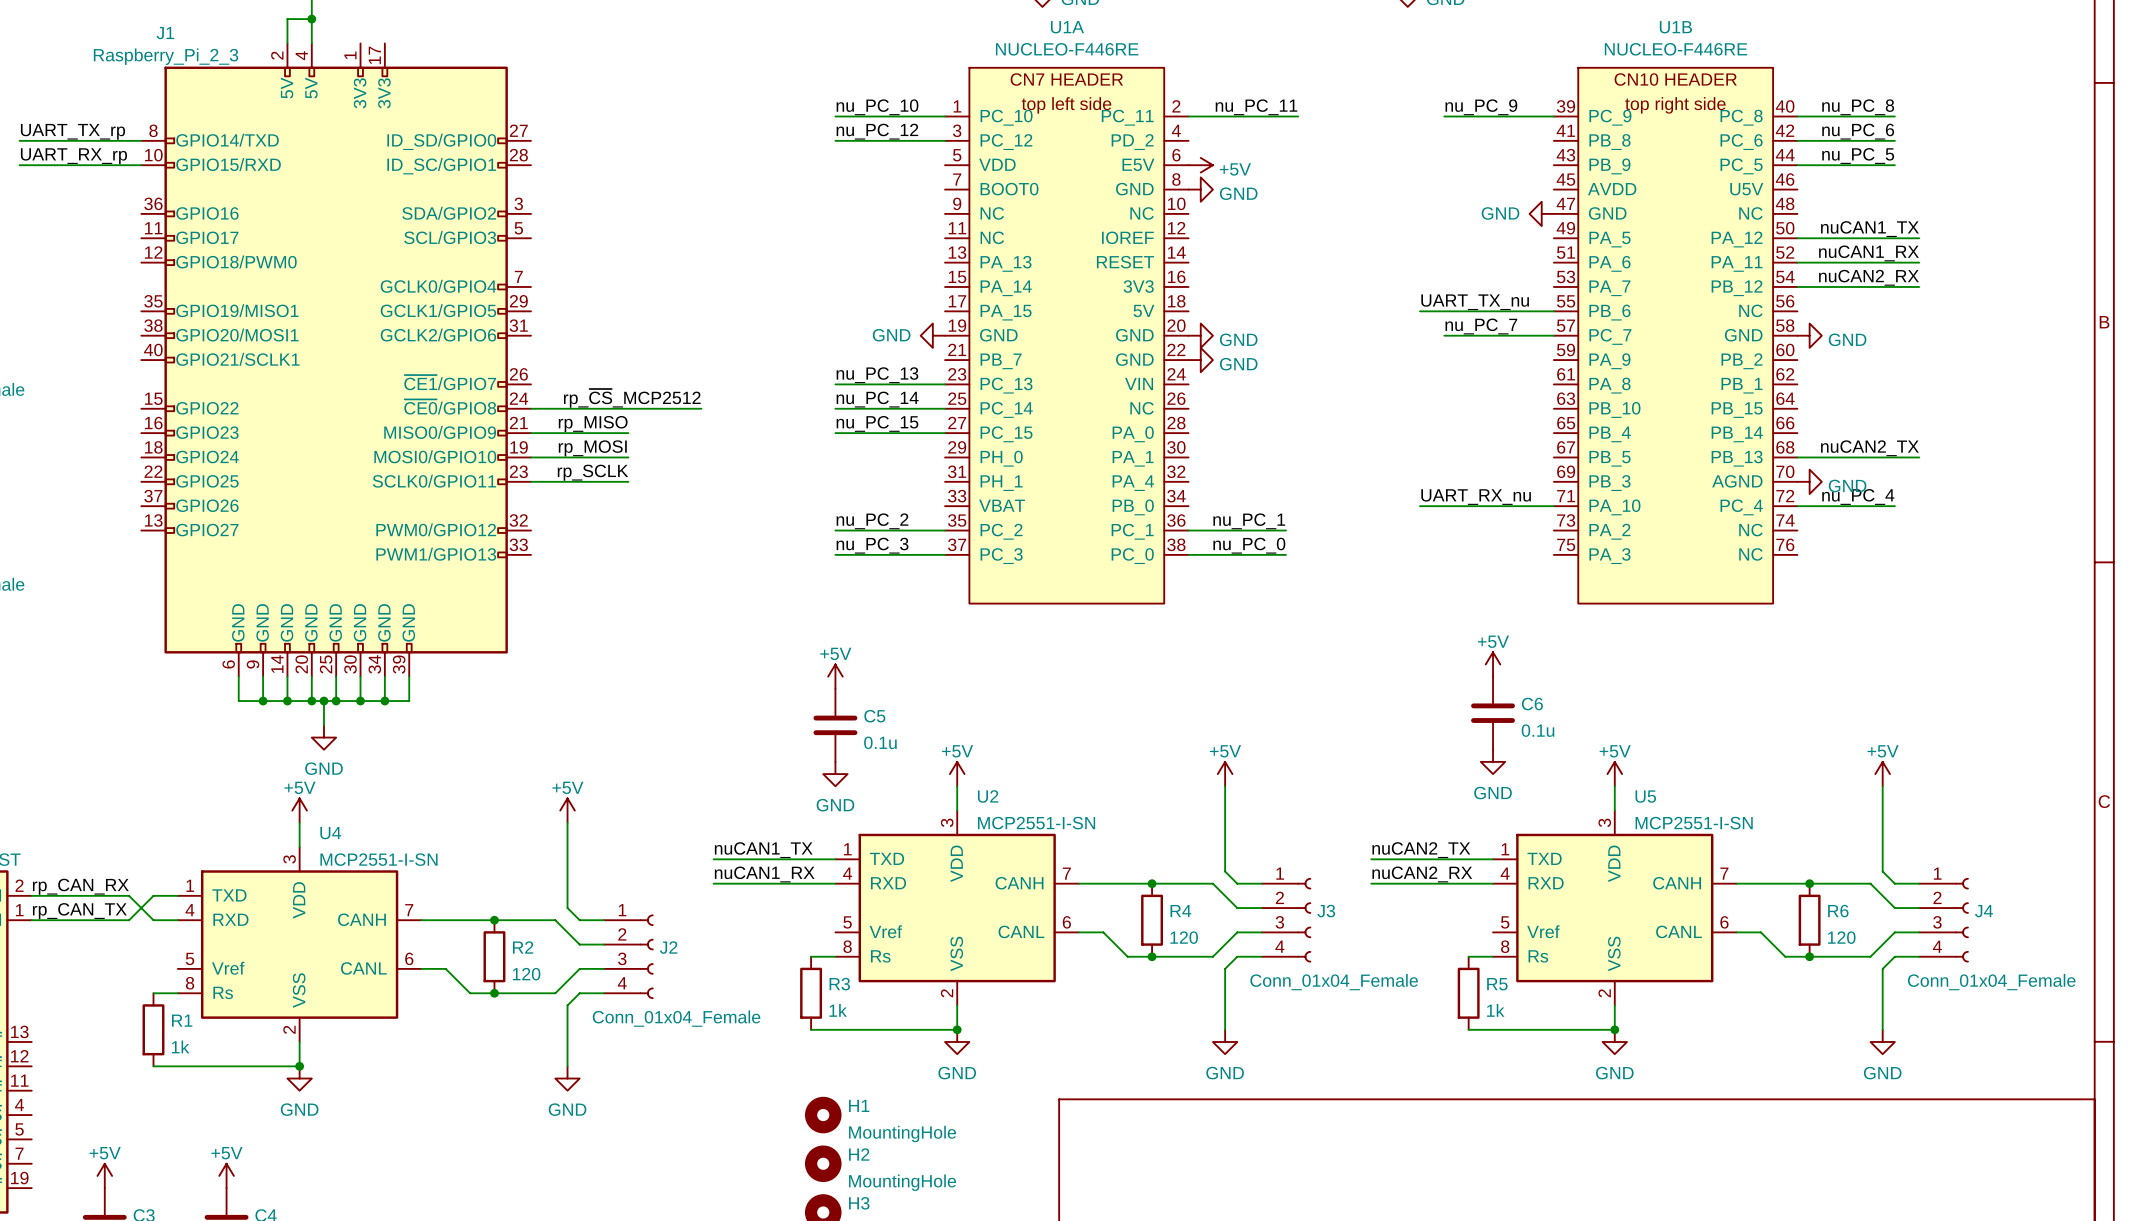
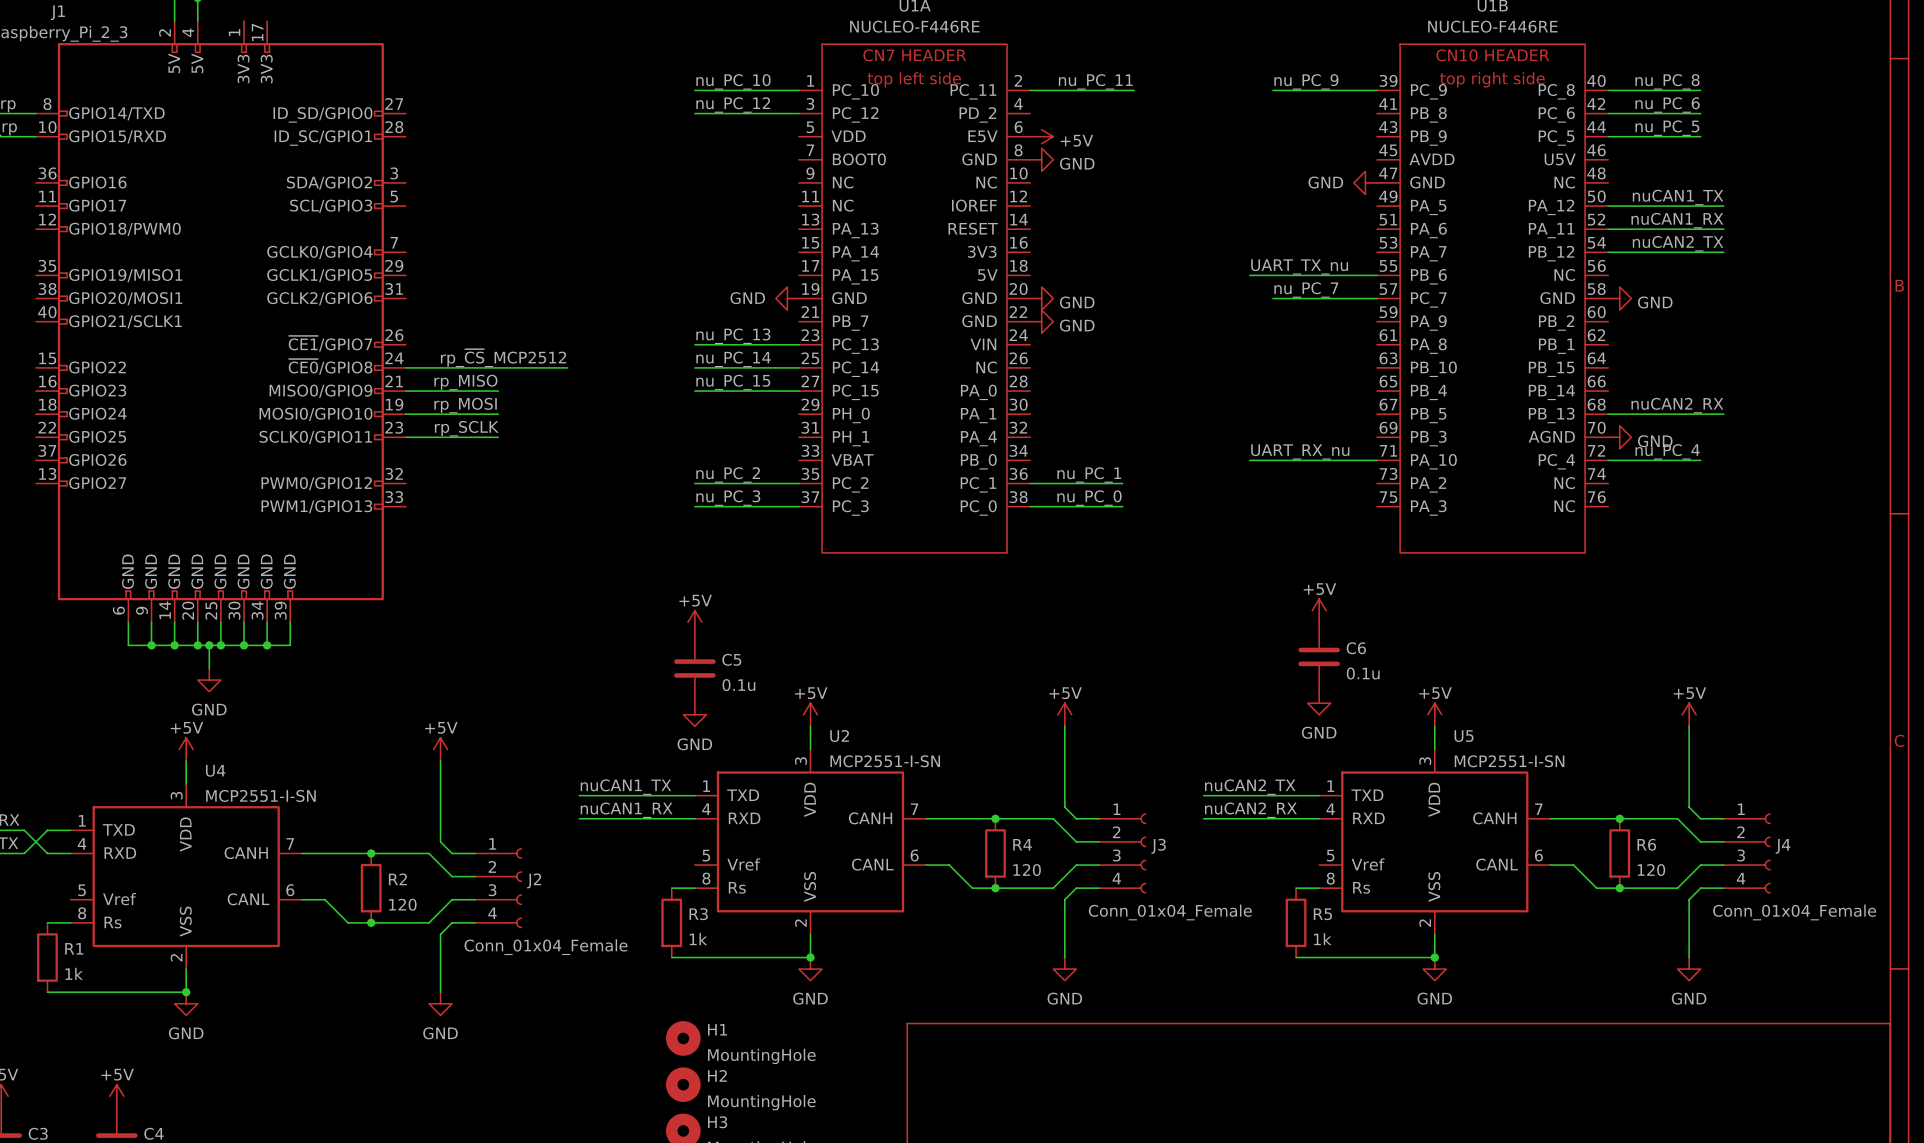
label: nuCAN2_RX (1868, 277) -> nuCAN2_TX (1678, 243)
label: nuCAN2_TX (1869, 448) -> nuCAN2_RX (1677, 405)

